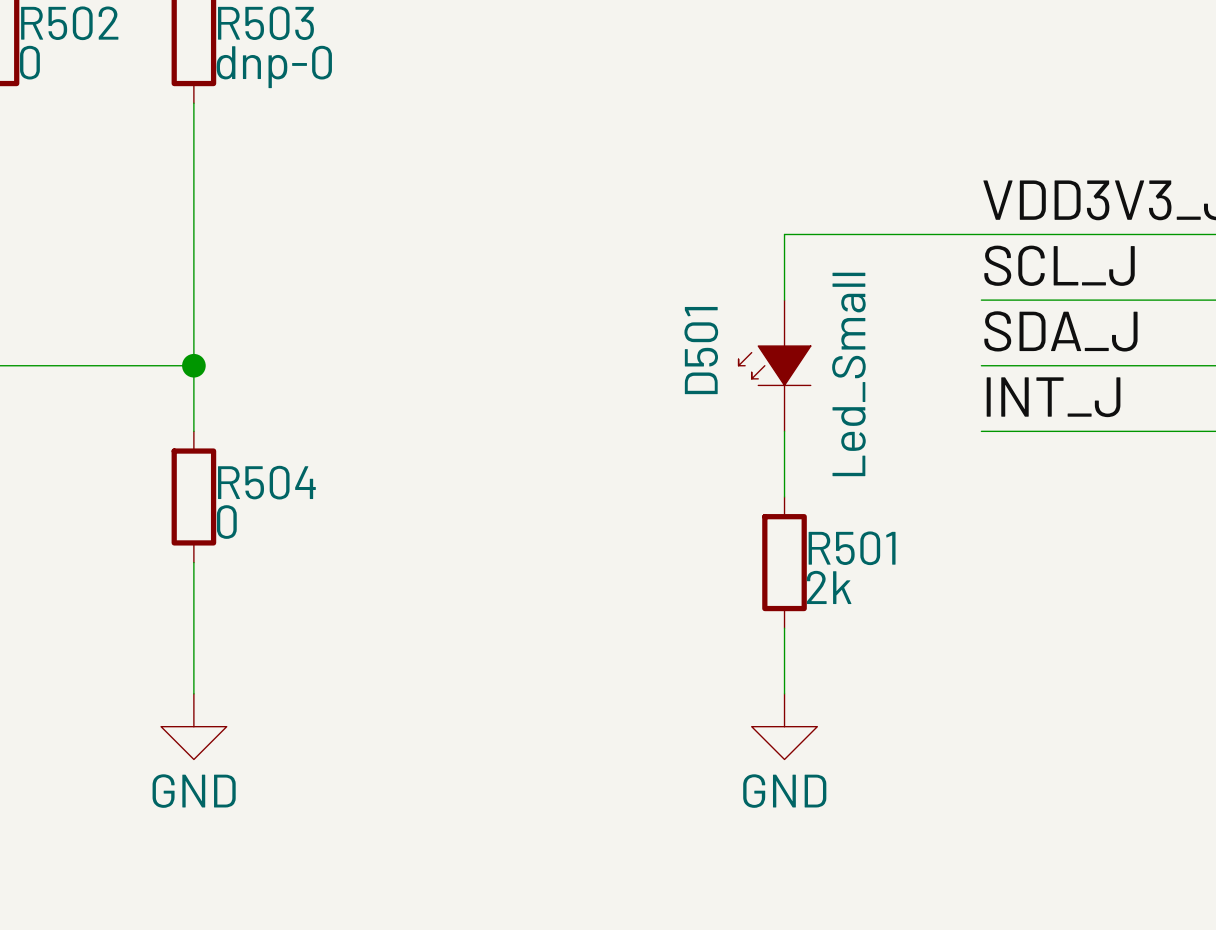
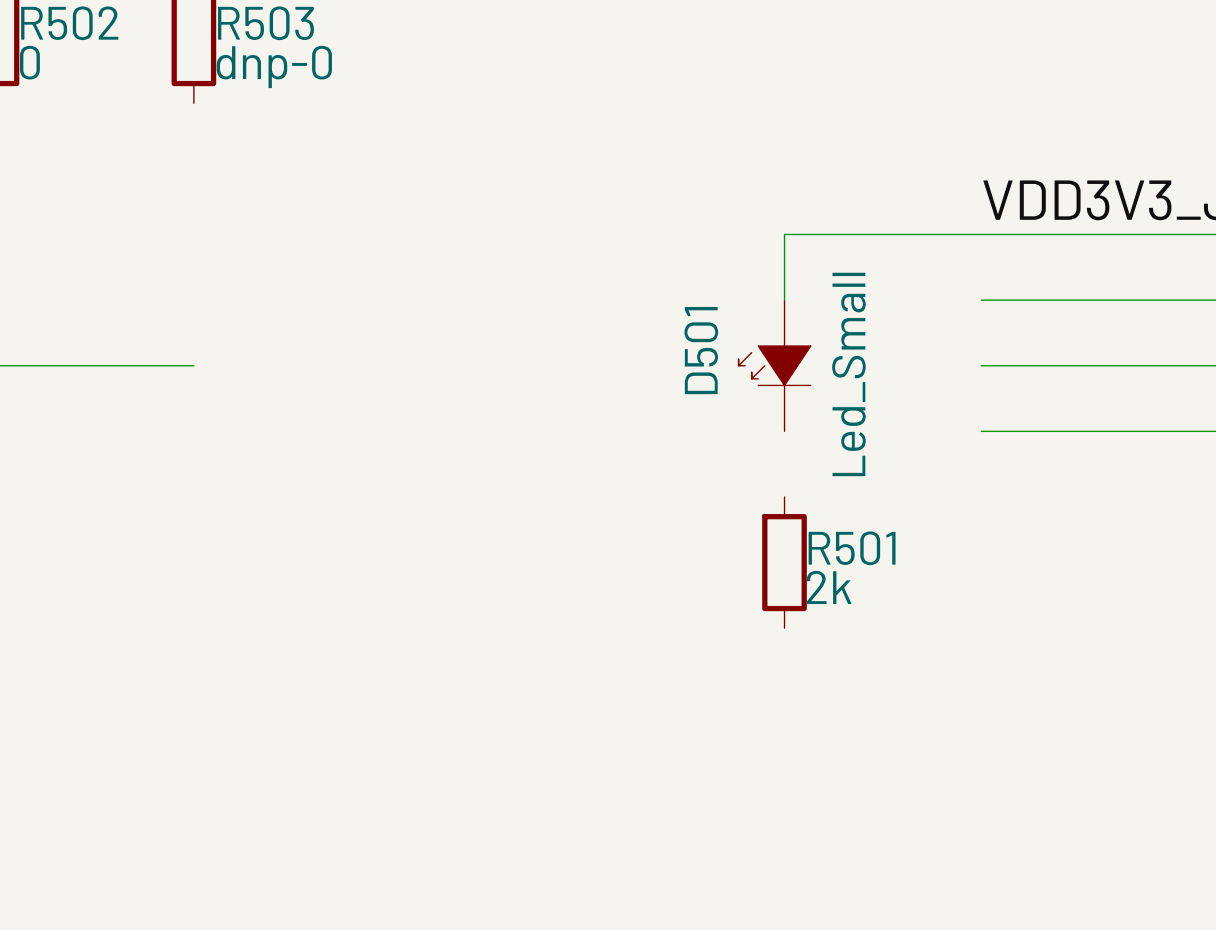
wire: (193, 103) (193, 431) -> none
label: SCL_J (1059, 265) -> none
label: SDA_J (1060, 331) -> none
junction: (193, 365) -> none
label: INT_J (1053, 397) -> none
wire: (784, 431) (784, 496) -> none
R504: 0 (193, 496) -> none
wire: (193, 562) (193, 693) -> none
wire: (784, 628) (784, 693) -> none
power symbol: GND (193, 726) -> none
power symbol: GND (784, 726) -> none

